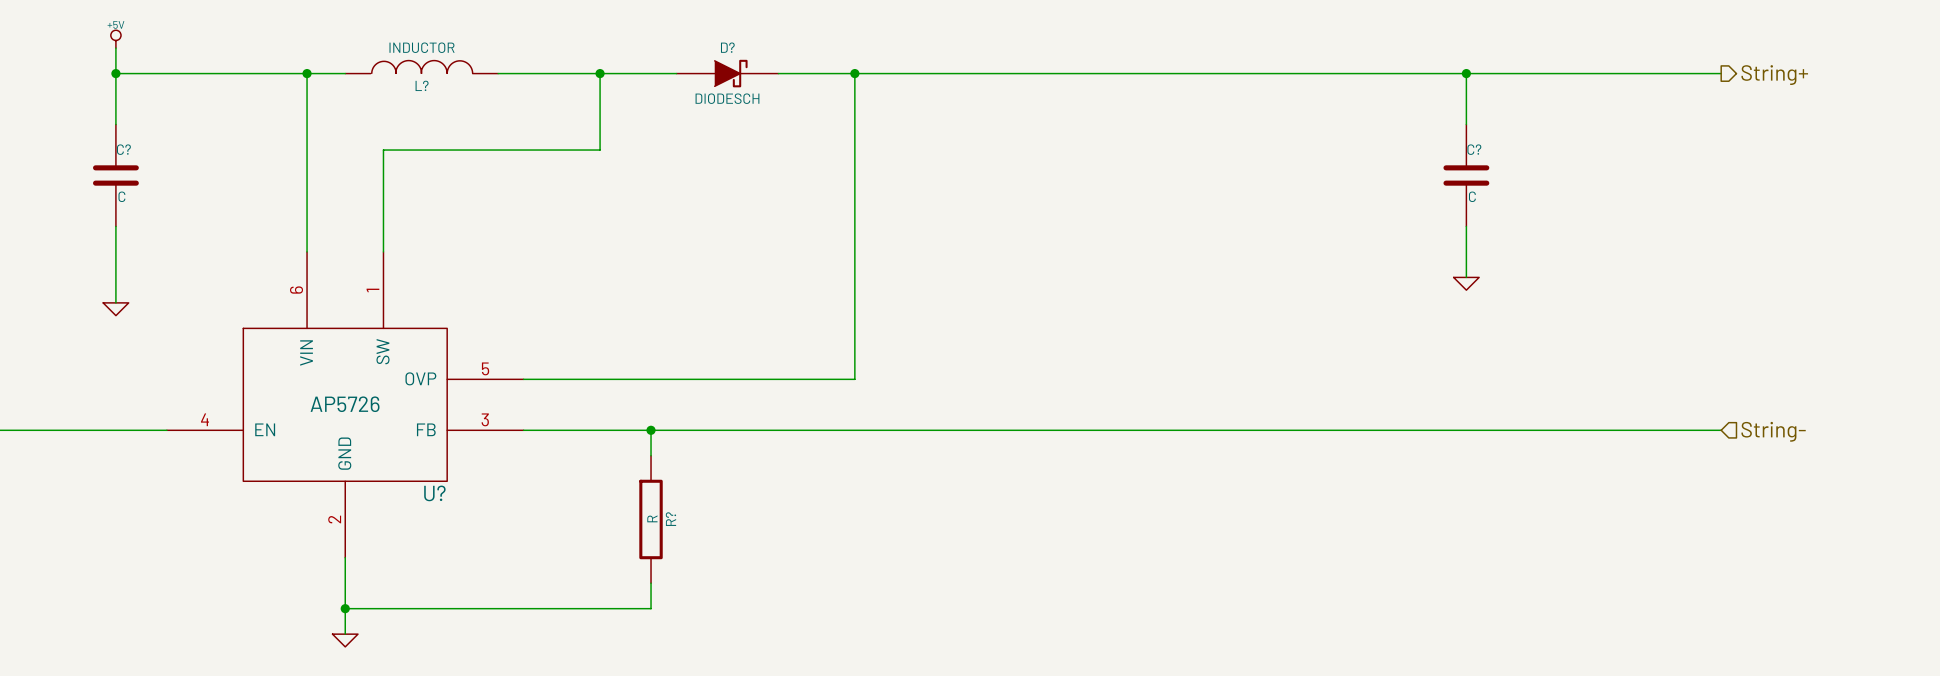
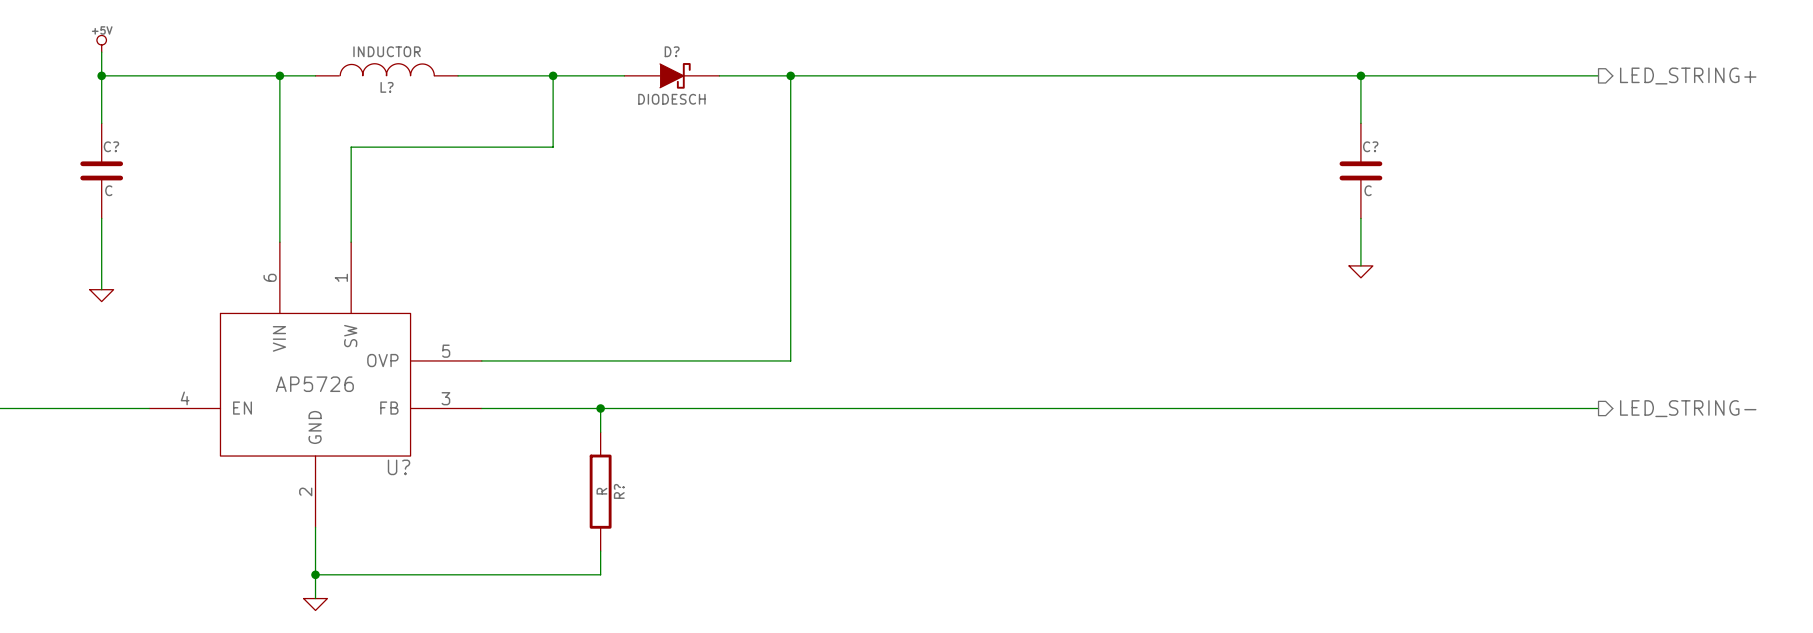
hierarchical label: String+ (1774, 75) -> LED_STRING+ (1688, 76)
hierarchical label shape: input (1773, 431) -> output (1688, 408)
hierarchical label: String- (1773, 431) -> LED_STRING- (1688, 408)

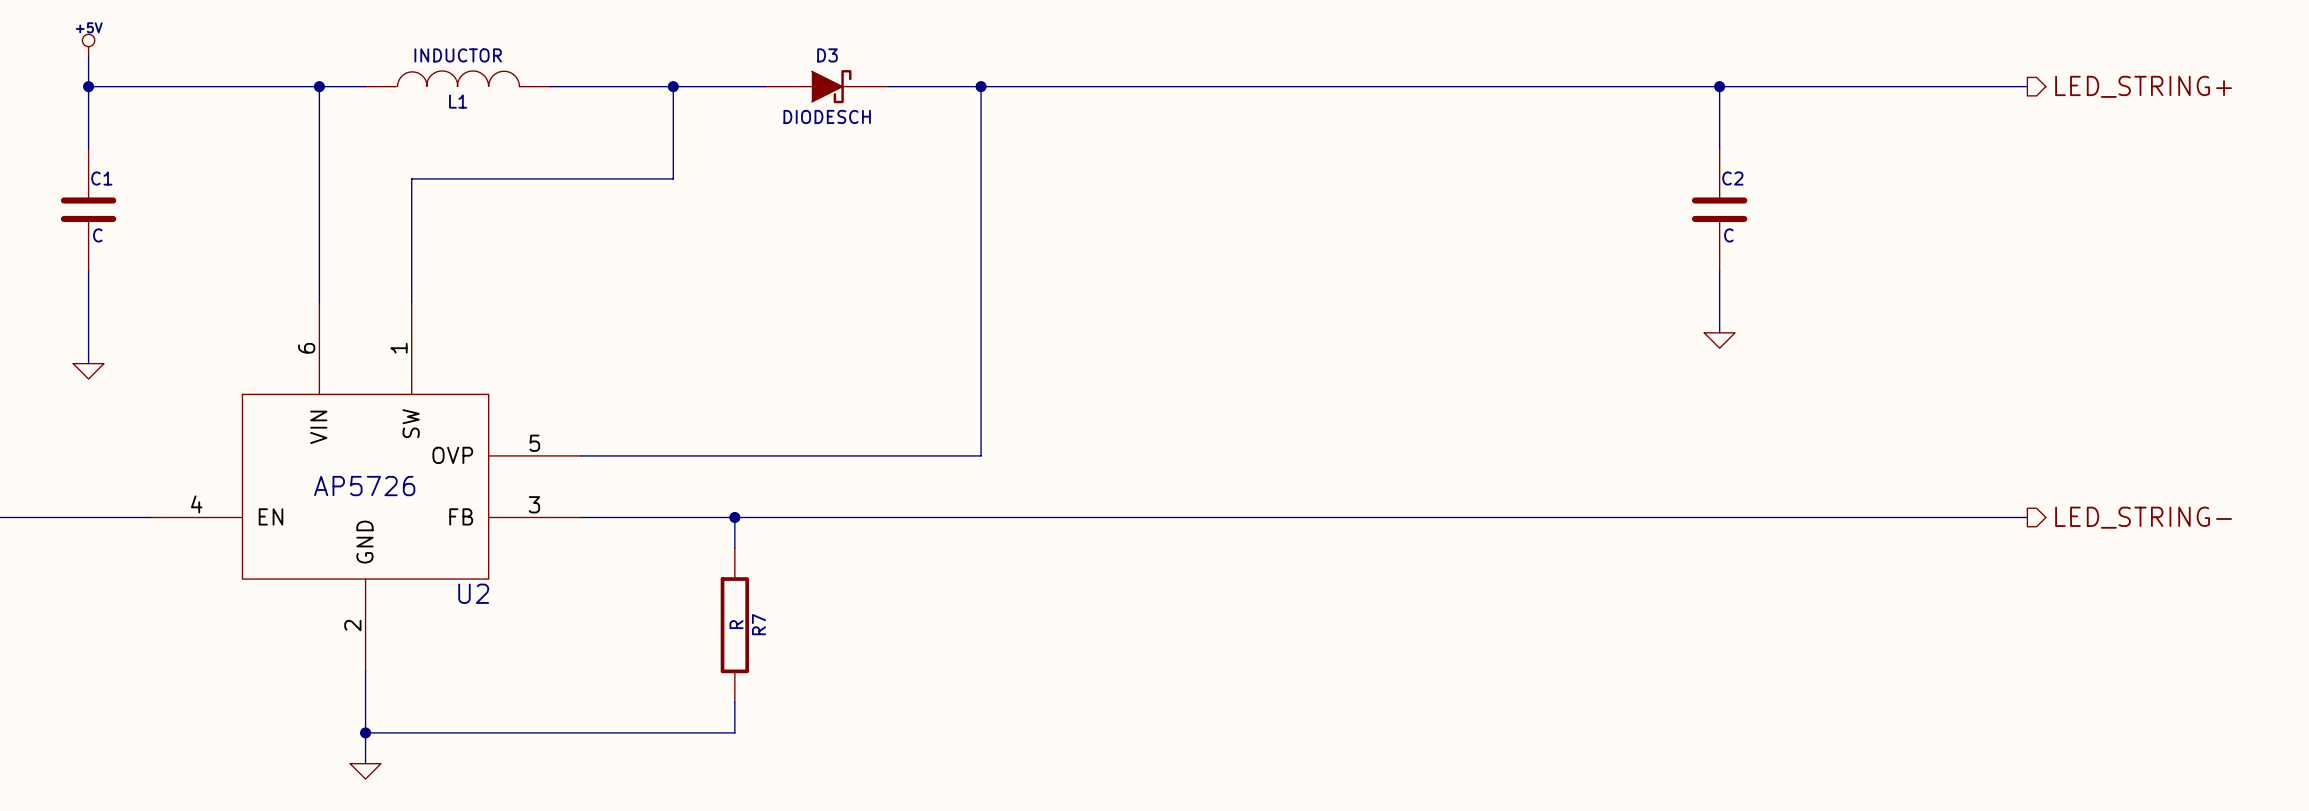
D? name: D? (672, 51) -> D3 (827, 55)
L? name: L? (387, 87) -> L1 (458, 101)
C? name: C? (111, 146) -> C1 (101, 178)
C? name: C? (1370, 146) -> C2 (1732, 178)
U? name: U? (399, 467) -> U2 (473, 593)
R? name: R? (619, 491) -> R7 (759, 624)

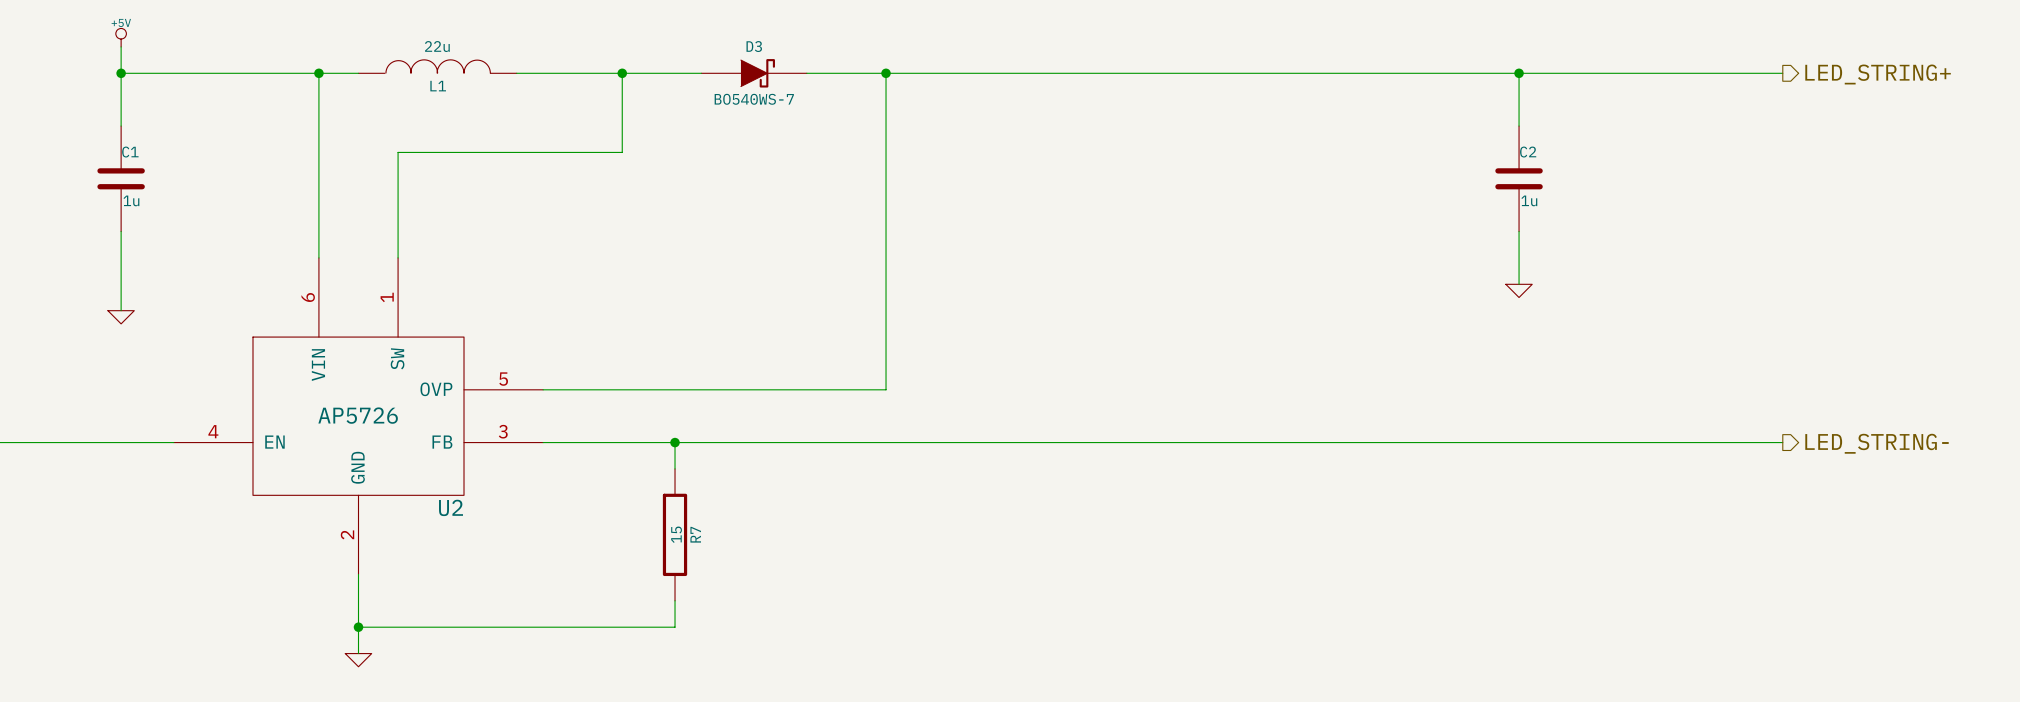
L1 value: INDUCTOR (458, 55) -> 22u (437, 46)
D3 value: DIODESCH (827, 116) -> BO540WS-7 (754, 99)
C1 value: C (97, 235) -> 1u (131, 200)
C2 value: C (1728, 235) -> 1u (1529, 200)
R7 value: R (736, 624) -> 15 (676, 534)

